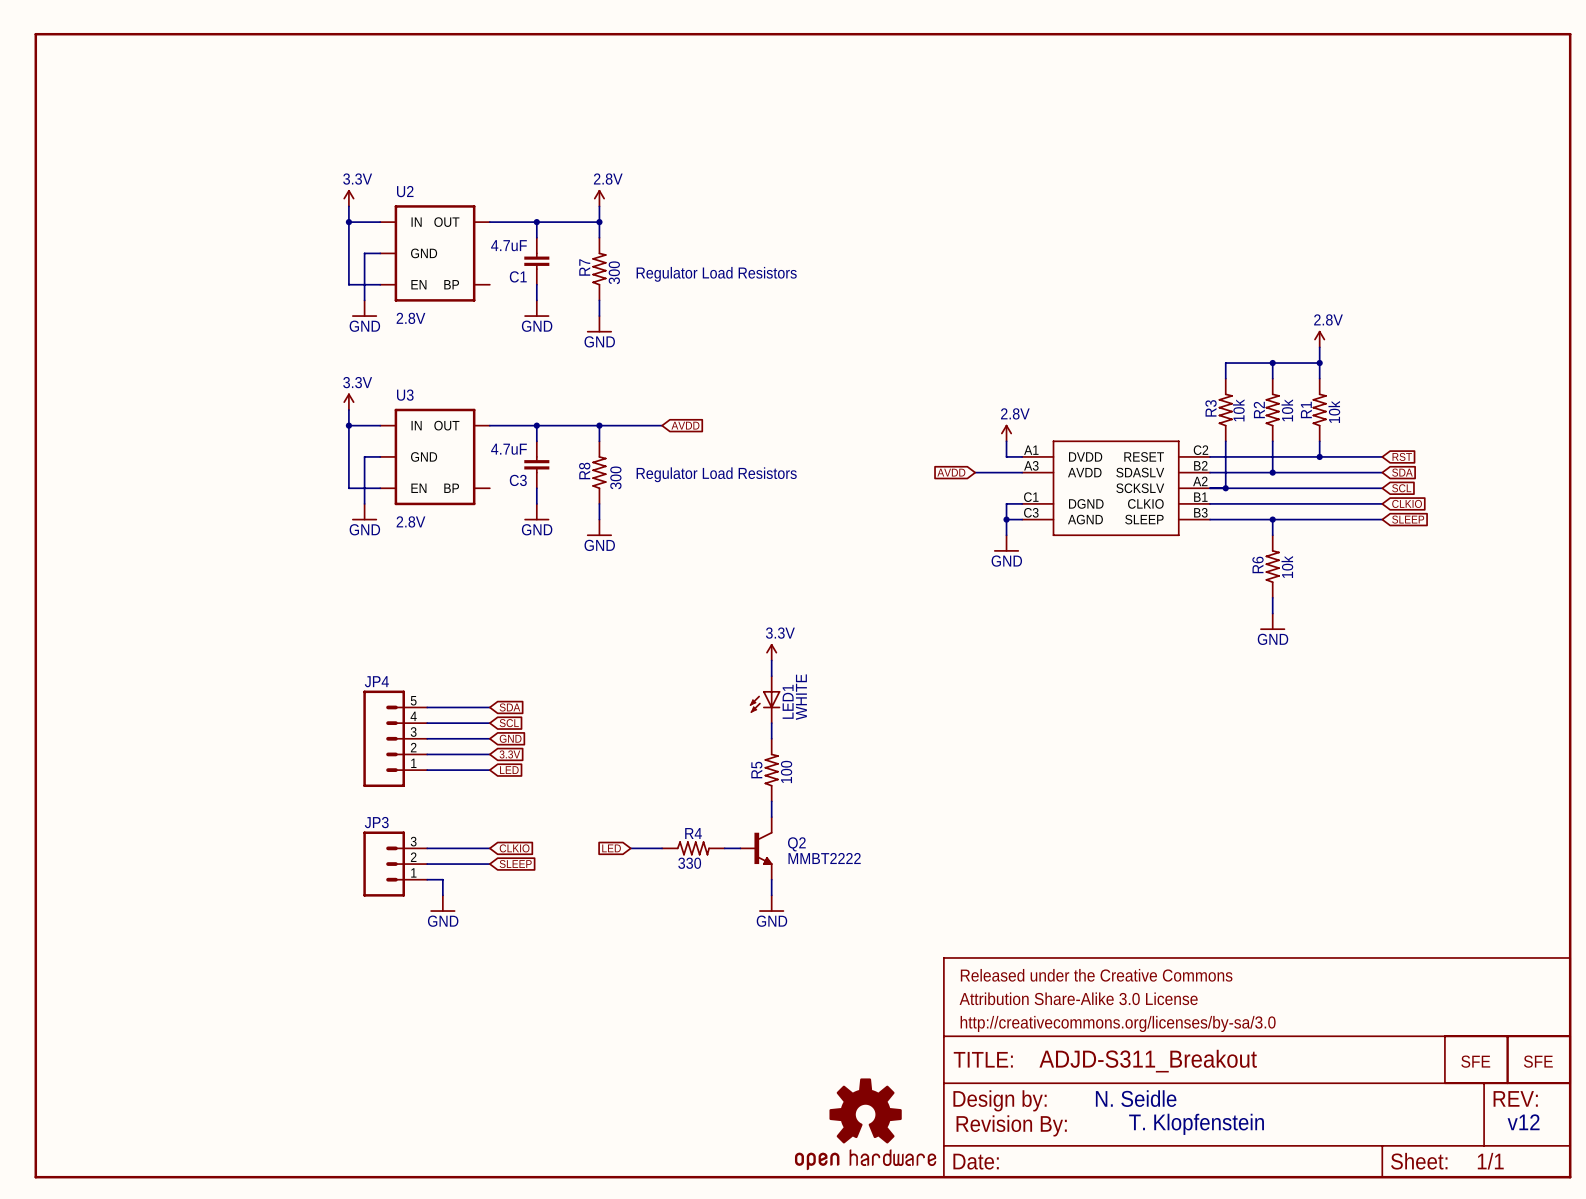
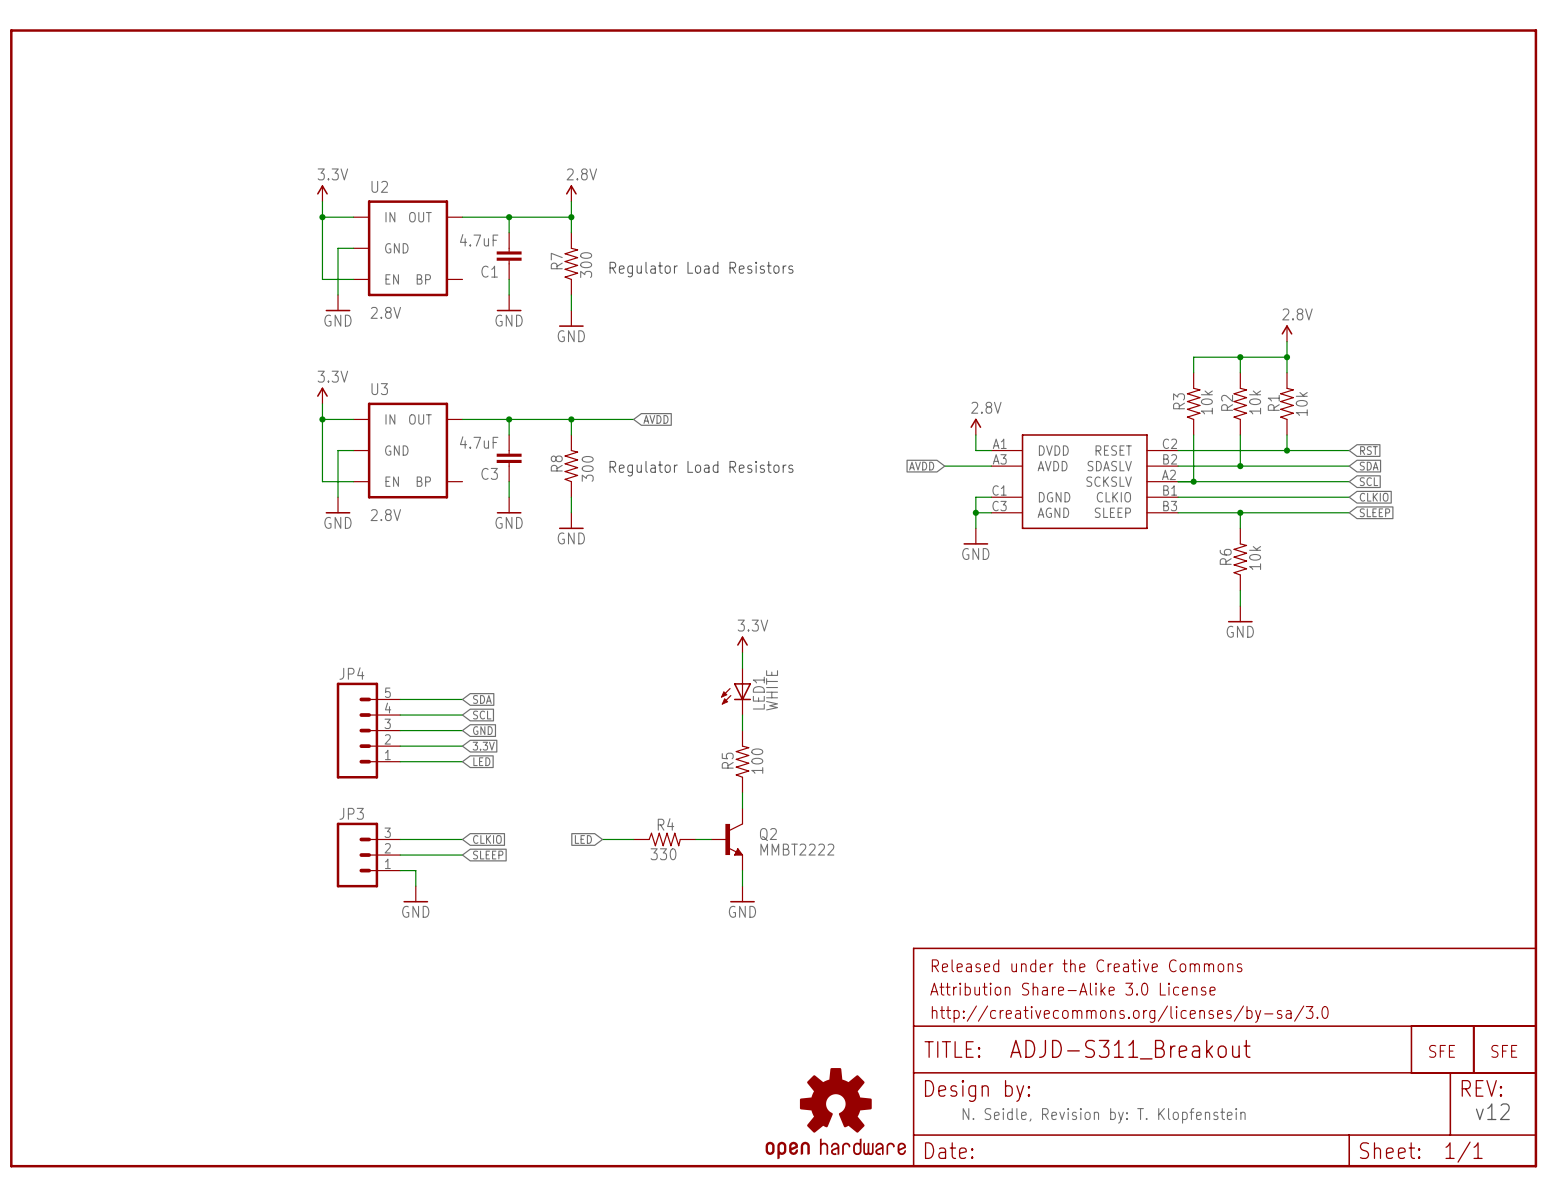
text: N. Seidle (1136, 1098) -> none
text: T. Klopfenstein (1196, 1124) -> none
part: (1011, 1125) -> none
text: none -> N. Seidle, Revision by: T. Klopfenstein (1104, 1115)

